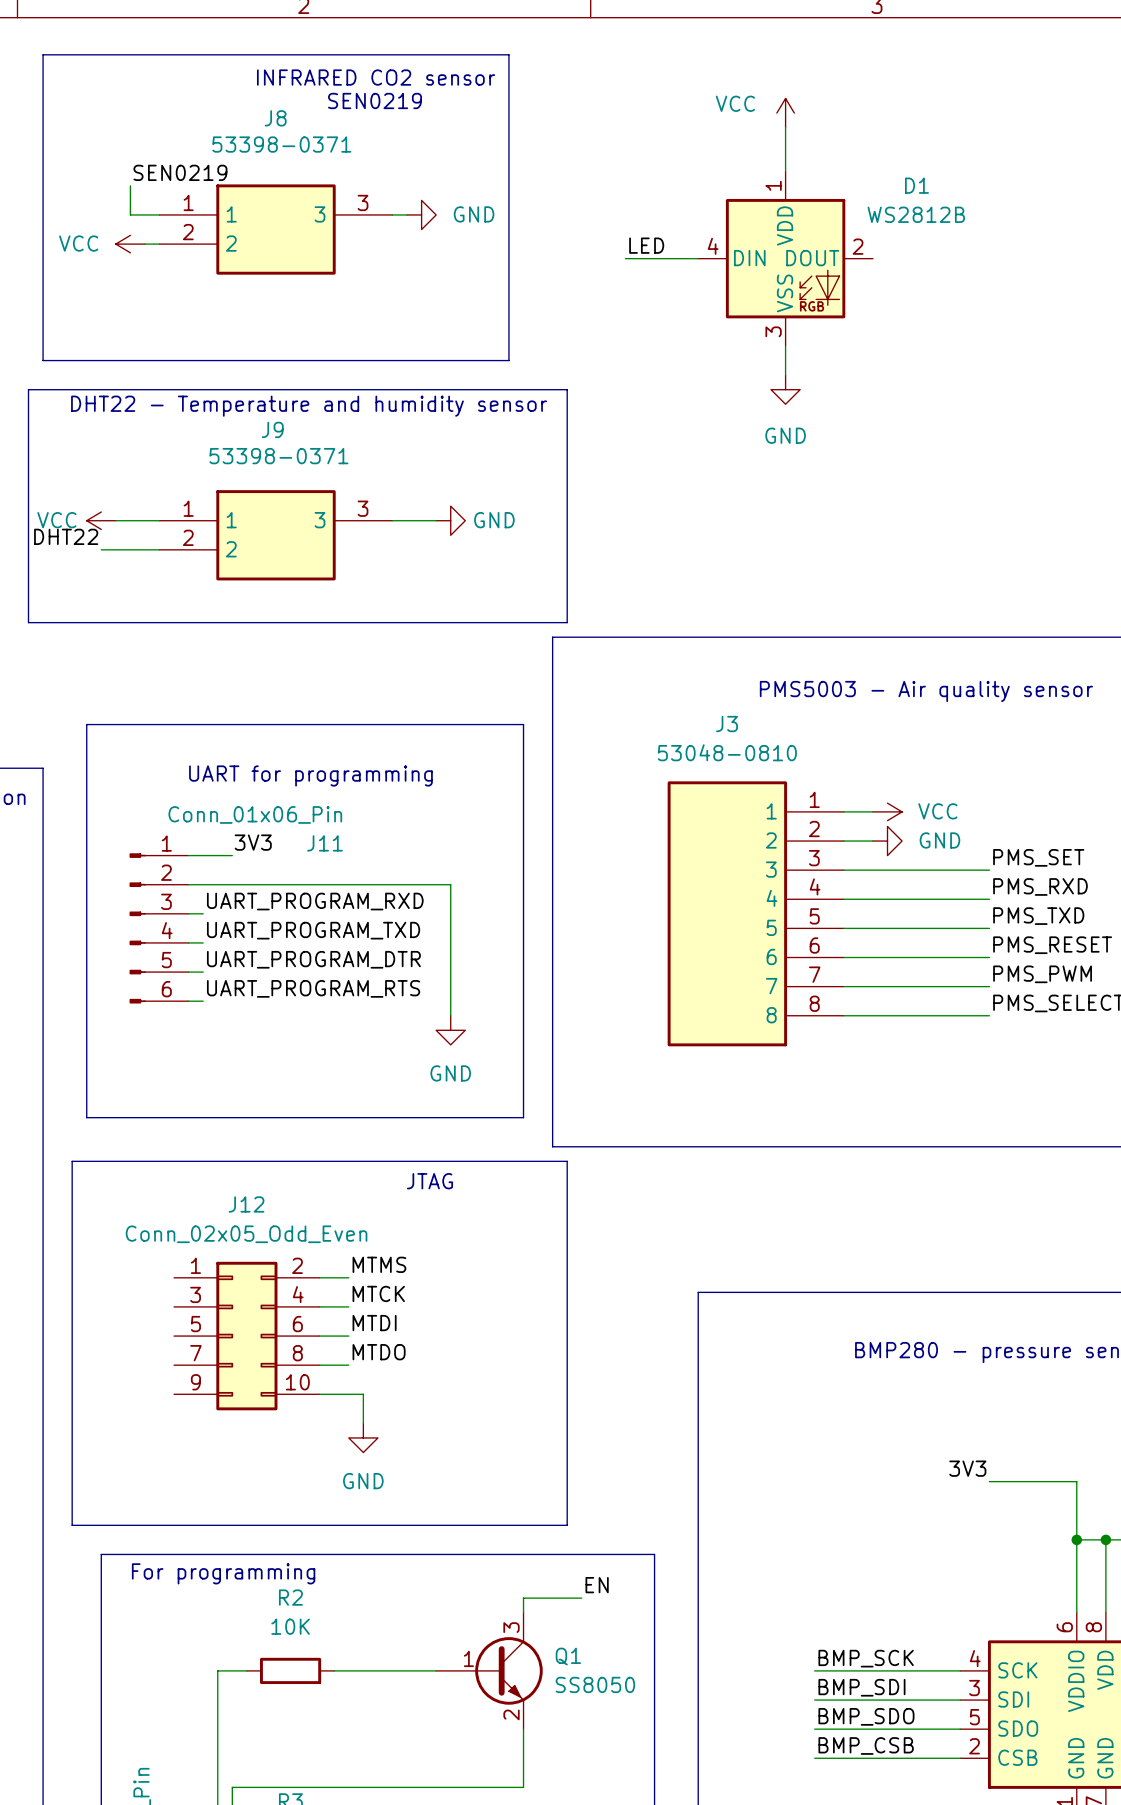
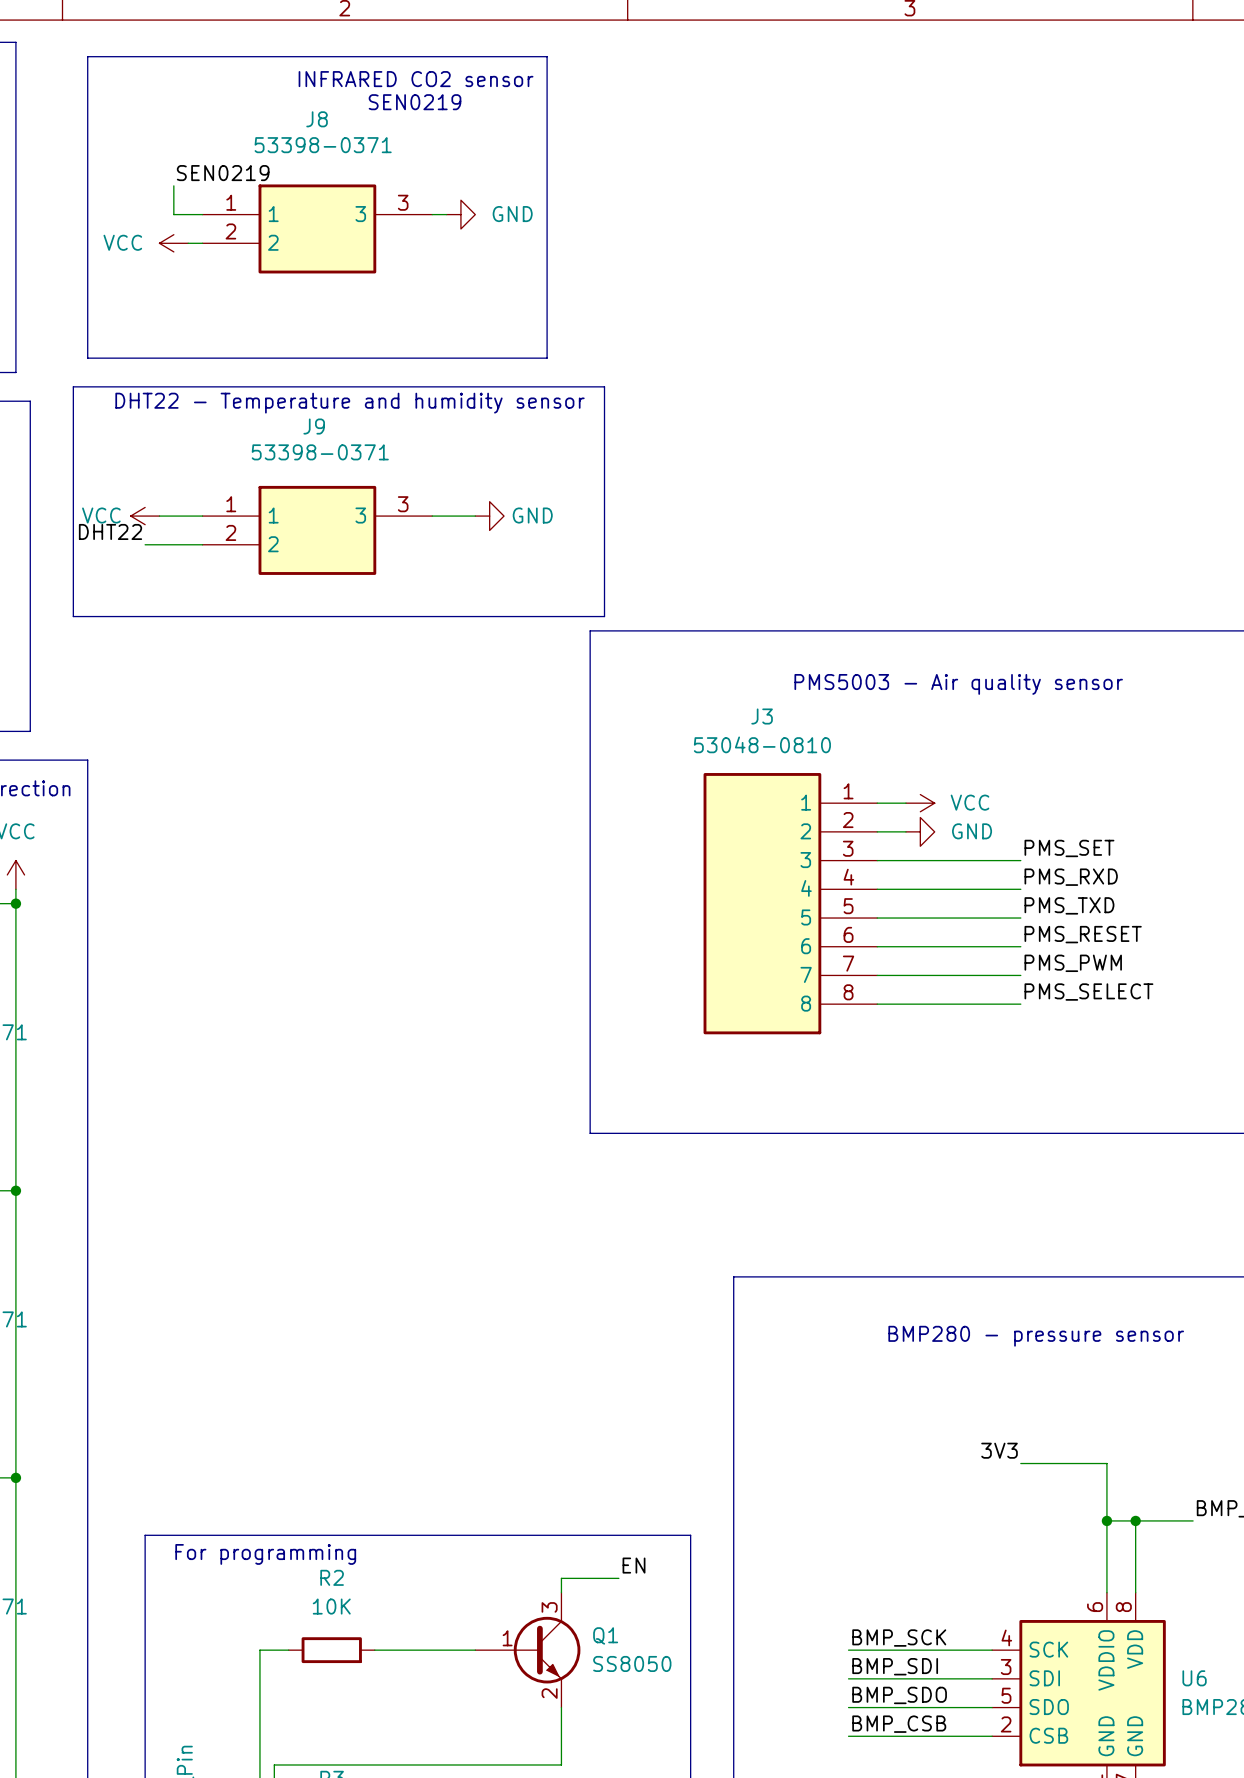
power symbol: VCC (785, 113) -> none
wire: (785, 127) (785, 171) -> none
label: LED (646, 245) -> none
wire: (625, 258) (698, 258) -> none
D1: WS2812B (785, 258) -> none
wire: (785, 346) (785, 375) -> none
power symbol: GND (785, 389) -> none
line: (86, 724) (523, 724) (523, 1117) (86, 1117) (86, 724) -> none
text: UART for programming (310, 775) -> none
label: 3V3 (253, 842) -> none
wire: (188, 855) (232, 855) -> none
wire: (188, 884) (450, 884) (450, 1015) -> none
label: UART_PROGRAM_RXD (315, 901) -> none
wire: (188, 913) (203, 913) -> none
J11: Conn_01x06_Pin (159, 928) -> none
label: UART_PROGRAM_TXD (313, 930) -> none
wire: (188, 942) (203, 942) -> none
label: UART_PROGRAM_DTR (313, 959) -> none
wire: (188, 972) (203, 972) -> none
label: UART_PROGRAM_RTS (313, 988) -> none
wire: (188, 1001) (203, 1001) -> none
power symbol: GND (450, 1030) -> none
line: (72, 1161) (567, 1161) (567, 1525) (72, 1525) (72, 1161) -> none
text: JTAG (429, 1181) -> none
label: MTMS (379, 1264) -> none
wire: (319, 1277) (348, 1277) -> none
label: MTCK (378, 1293) -> none
wire: (319, 1306) (348, 1306) -> none
label: MTDI (374, 1323) -> none
J12: Conn_02x05_Odd_Even (246, 1336) -> none
wire: (319, 1336) (348, 1336) -> none
label: MTDO (379, 1352) -> none
wire: (319, 1365) (348, 1365) -> none
wire: (319, 1394) (363, 1394) (363, 1423) -> none
power symbol: GND (363, 1437) -> none

